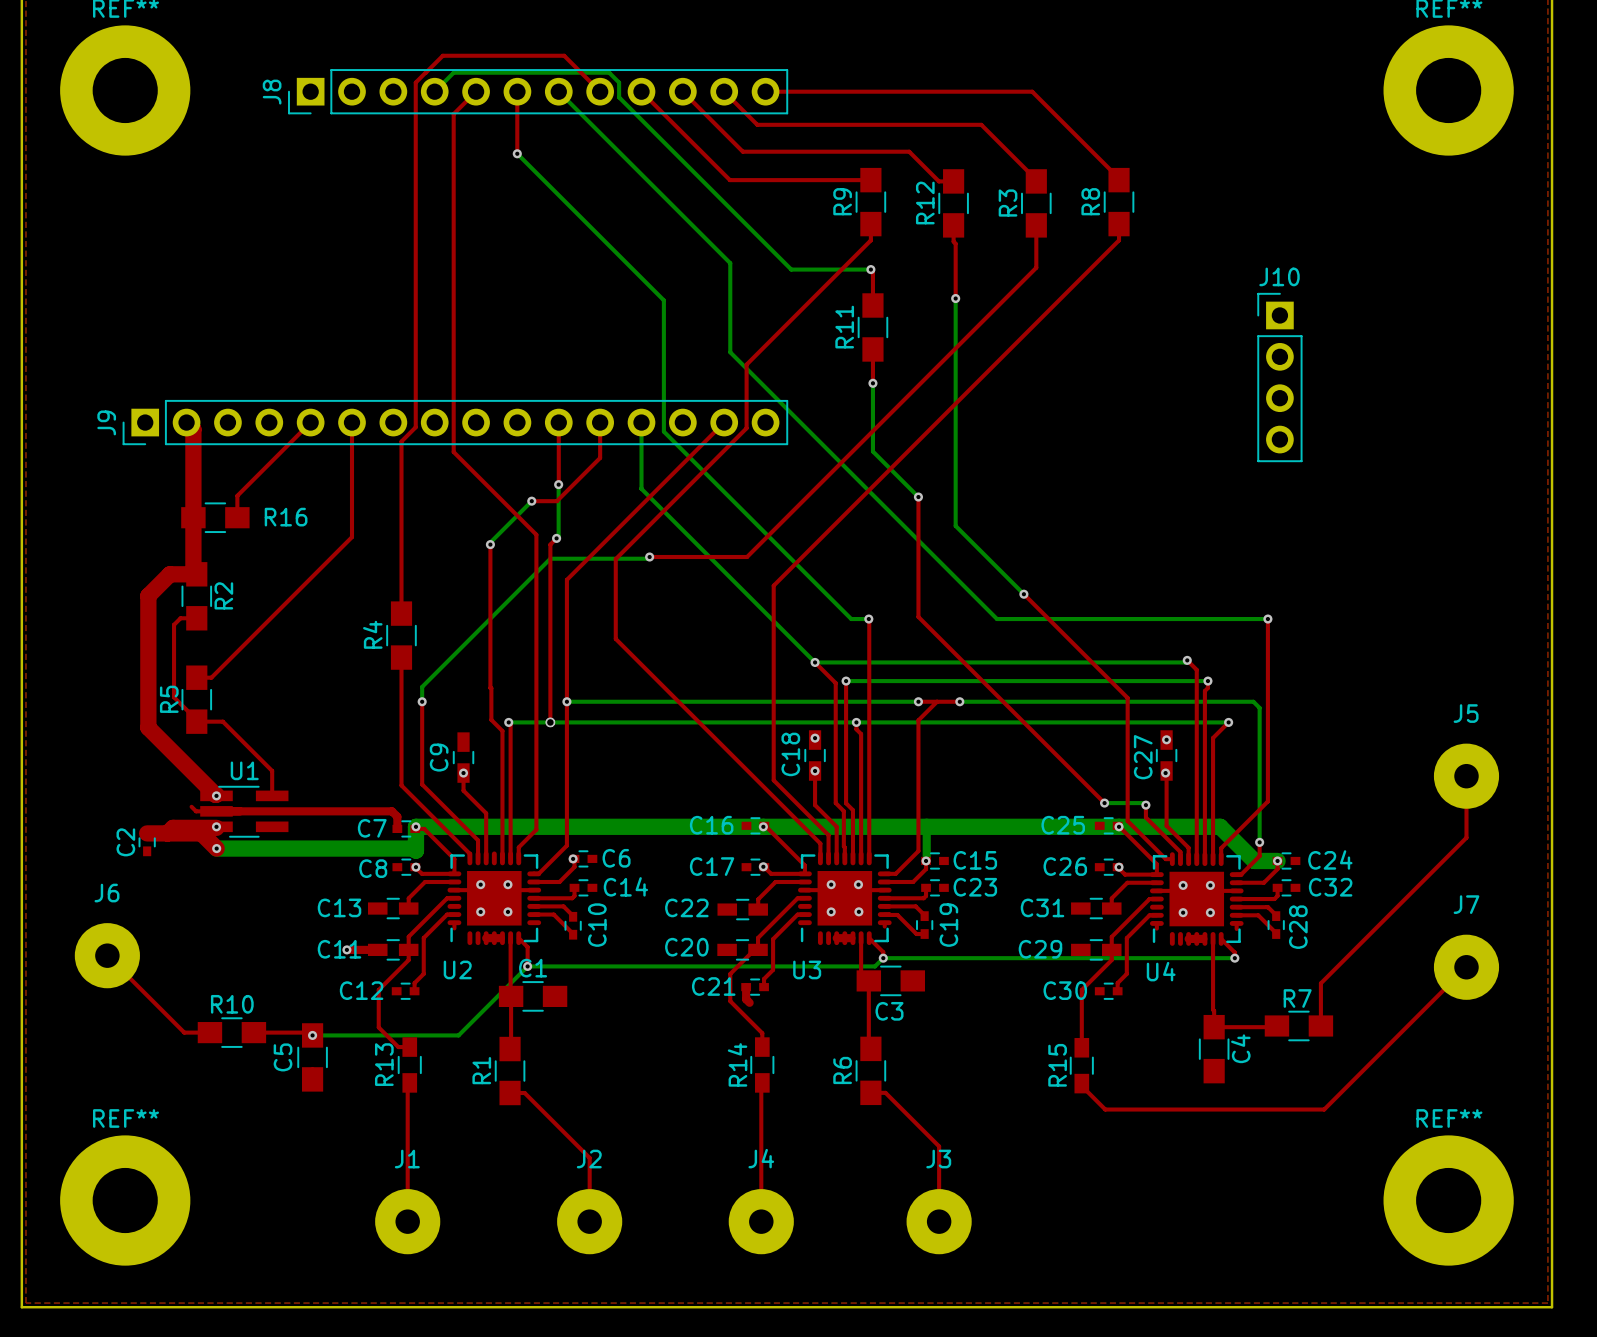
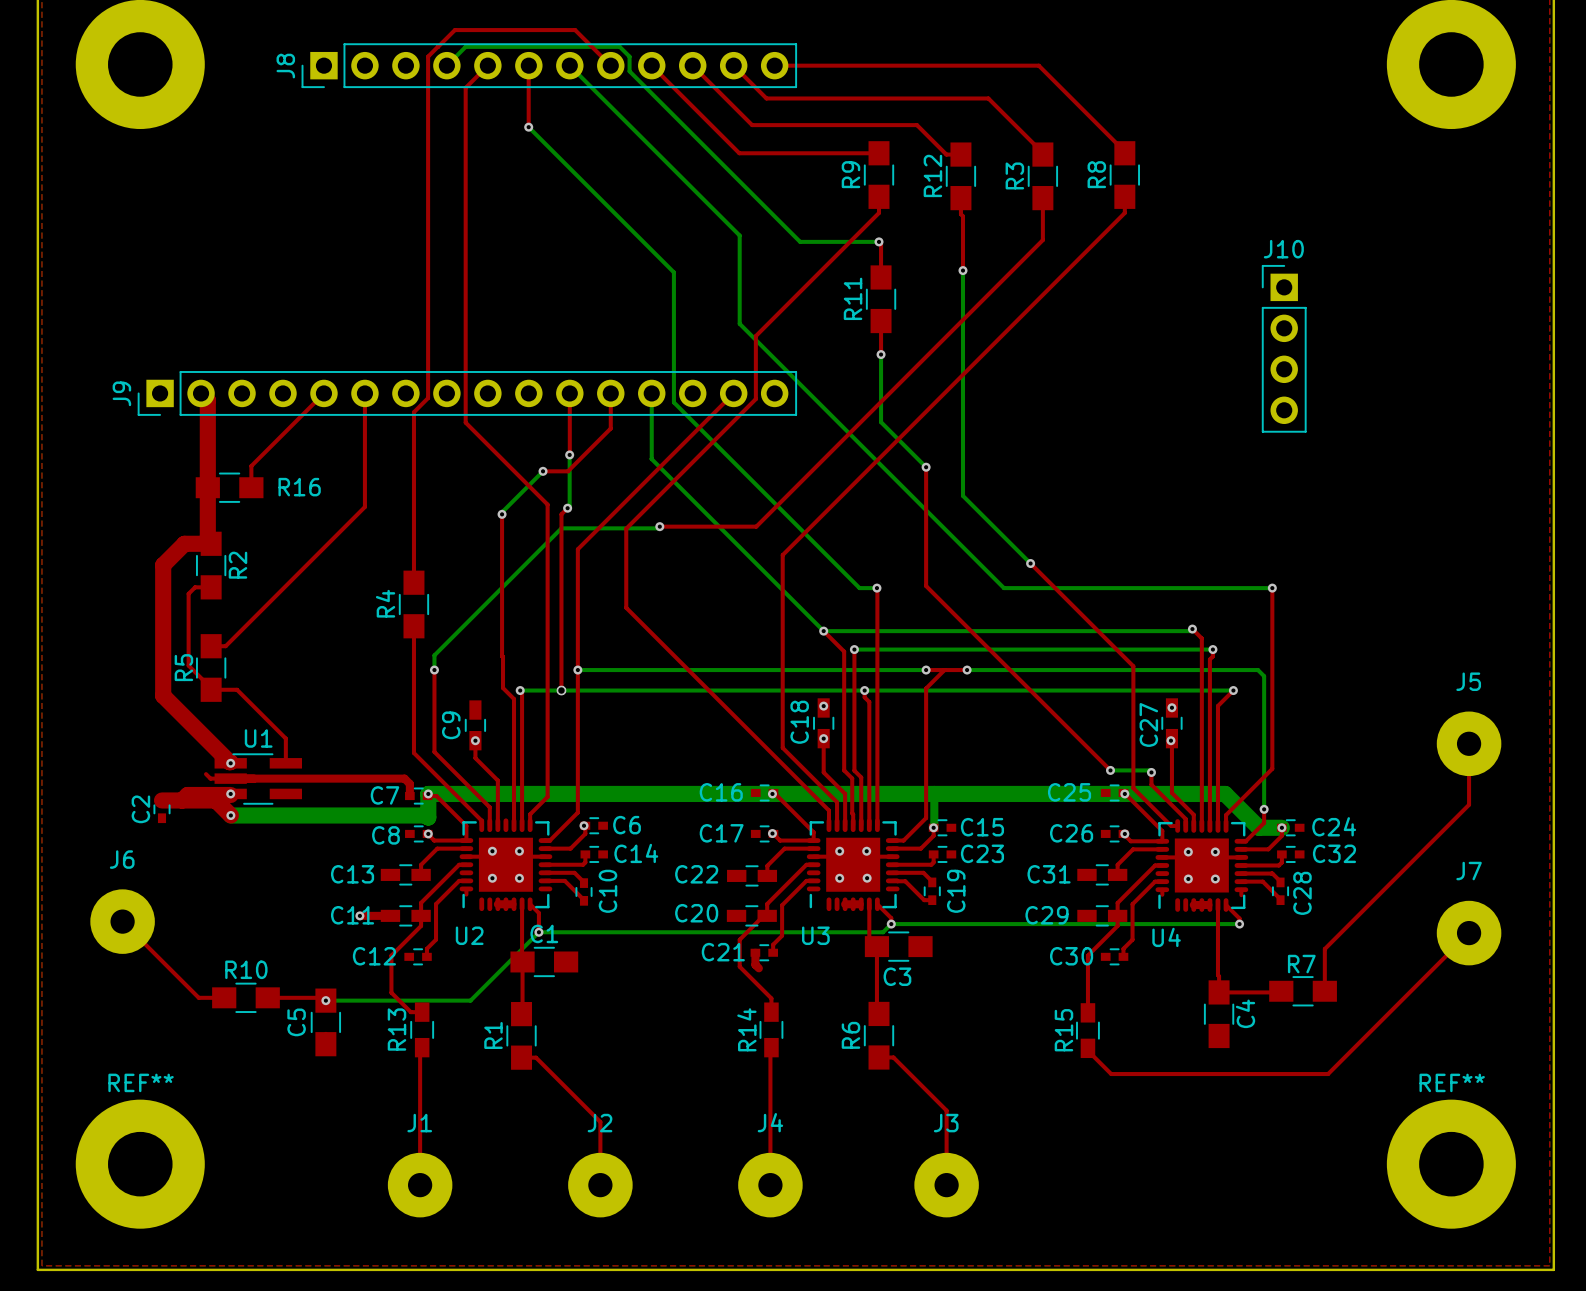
top track: (884, 922) (884, 926) -> none

